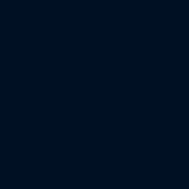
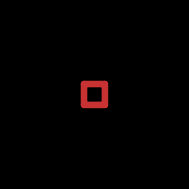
track: none -> (84, 84) (104, 84) (104, 104) (84, 104) (84, 84)

